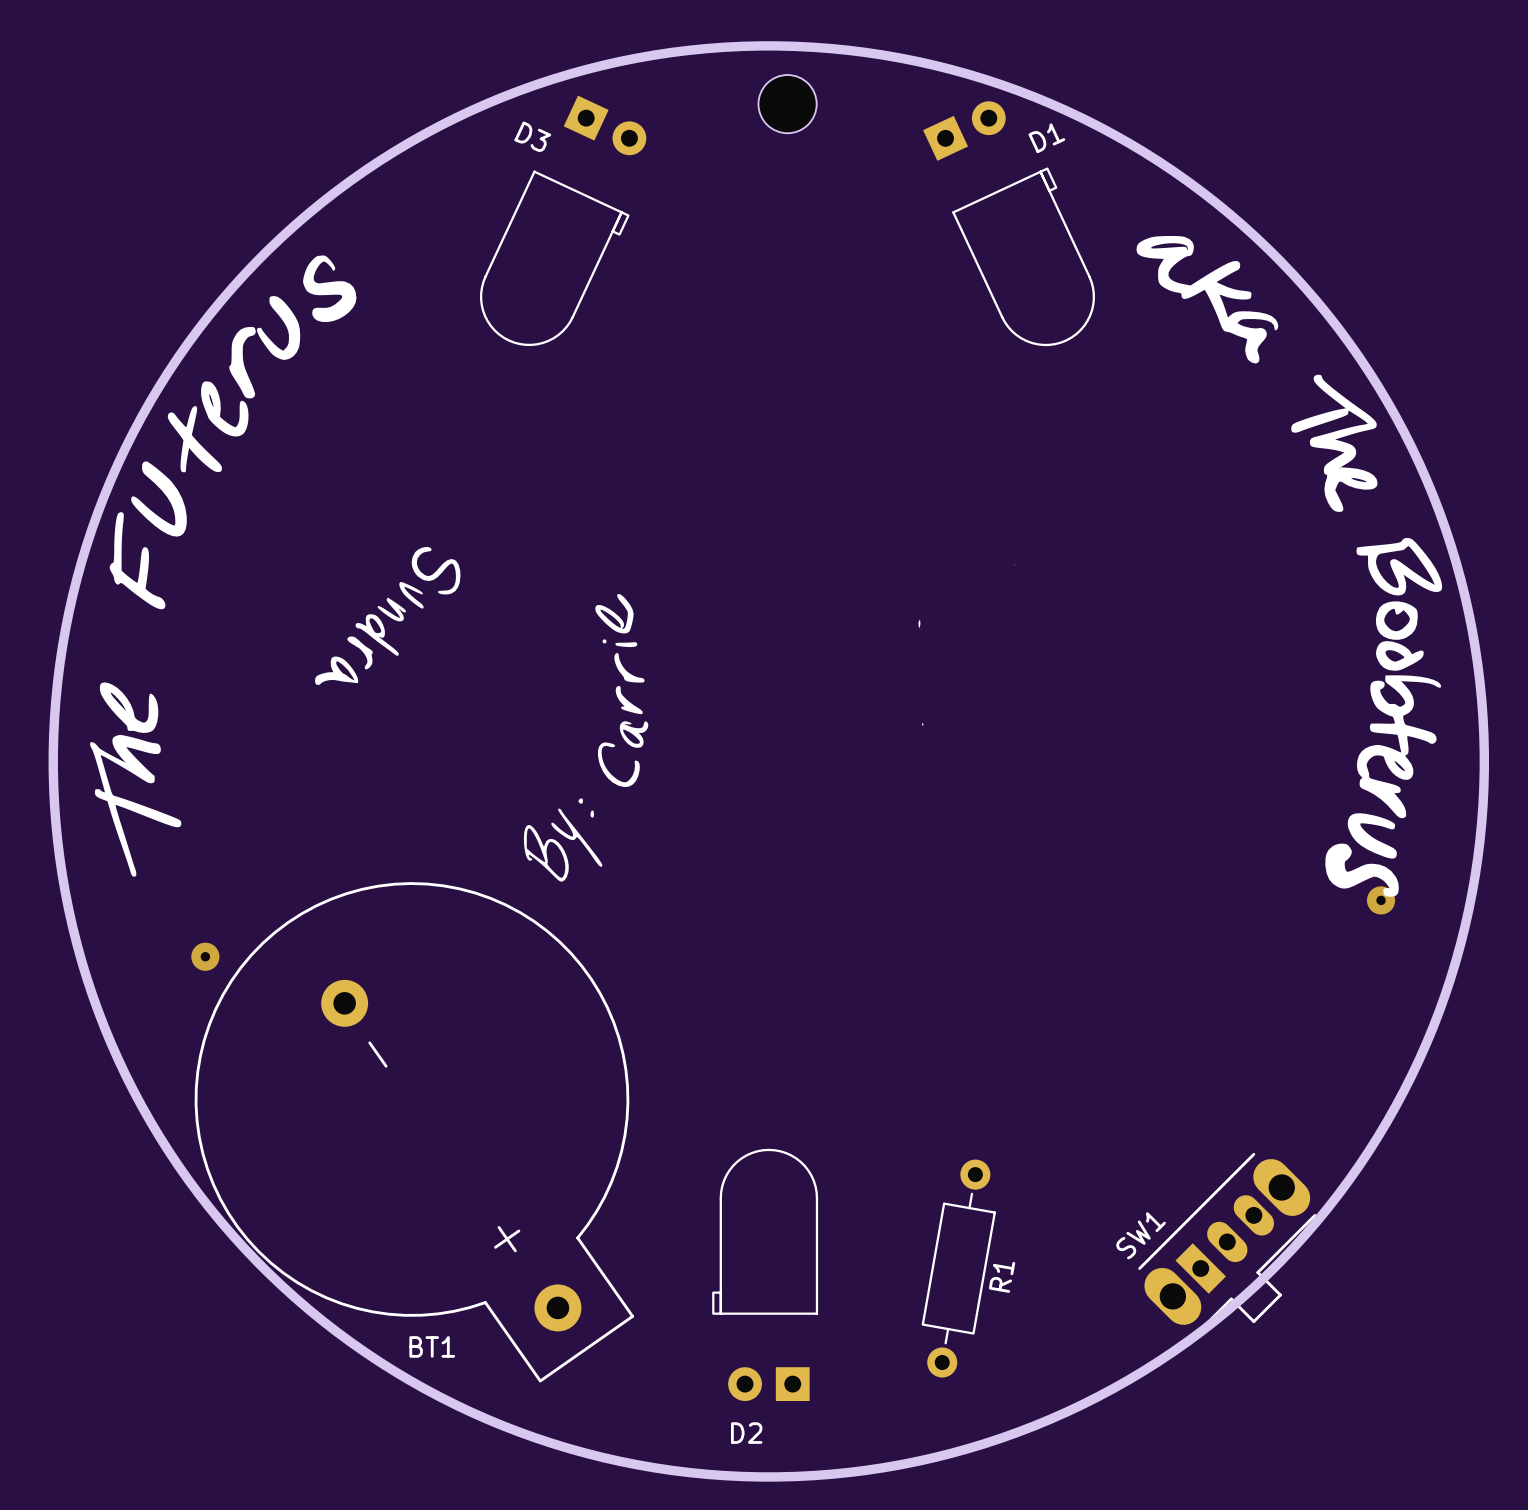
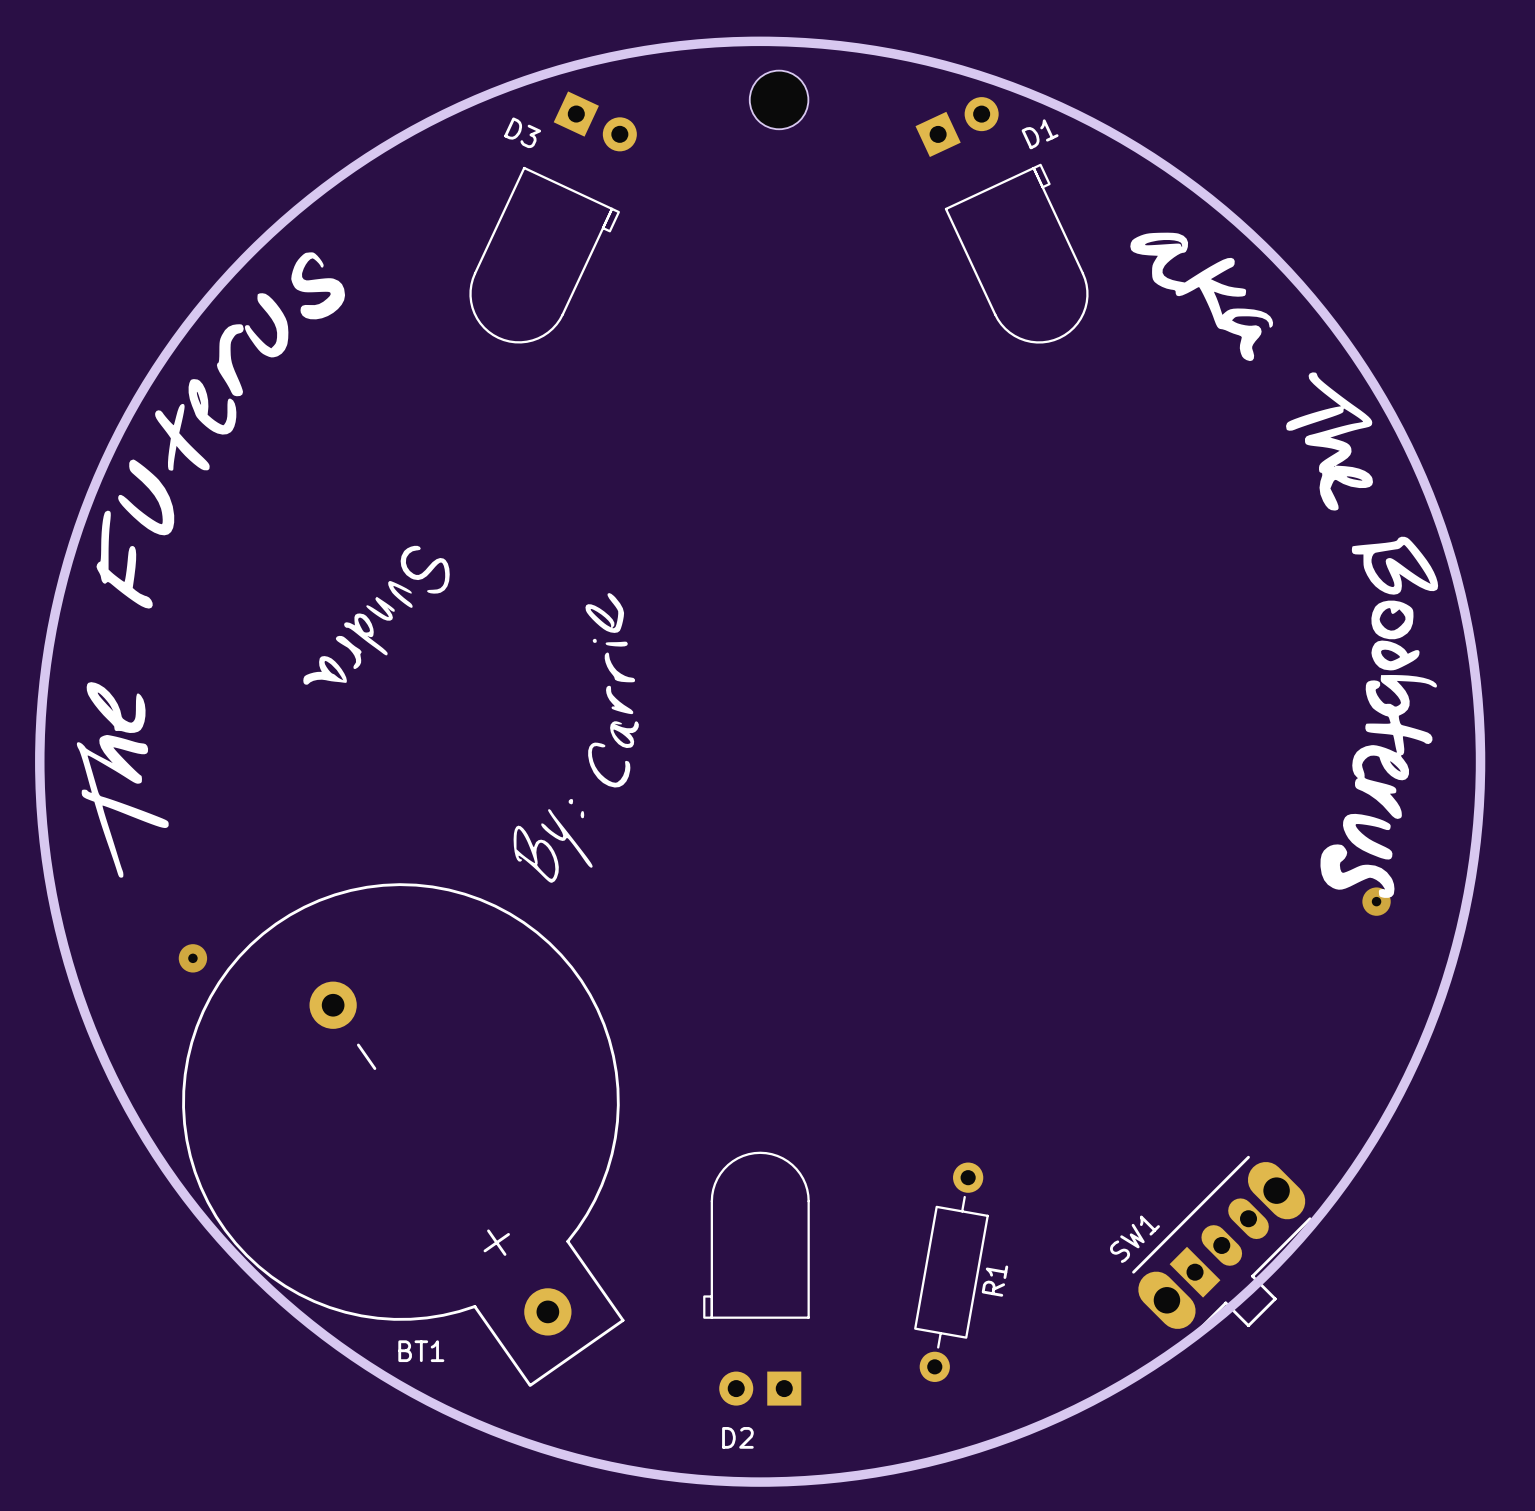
drawing shape: [90, 235, 1443, 897] -> [76, 232, 1439, 898]

